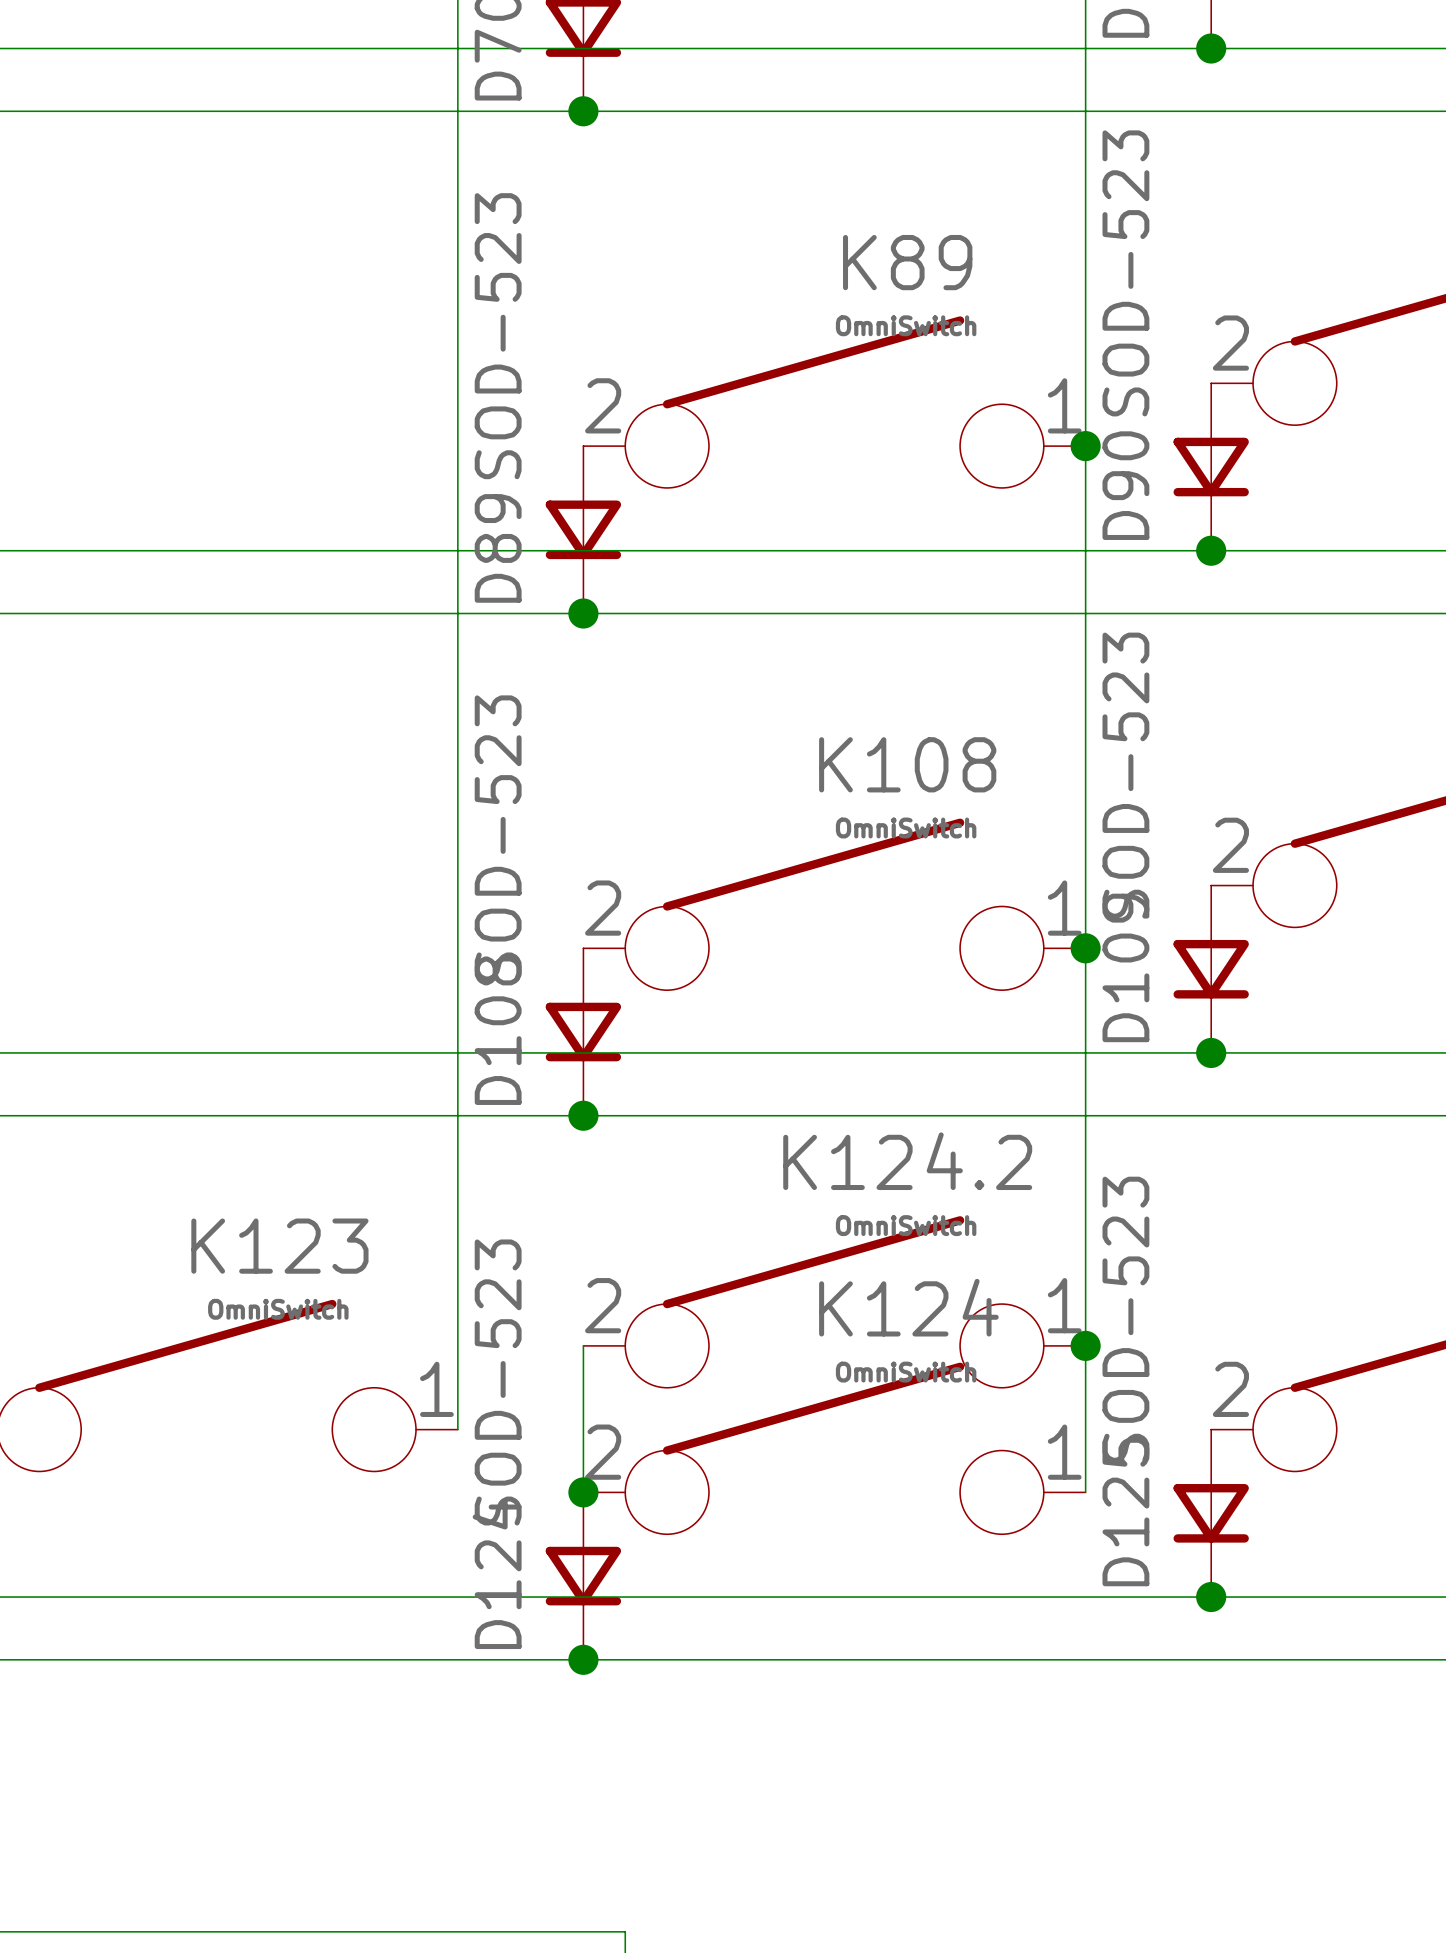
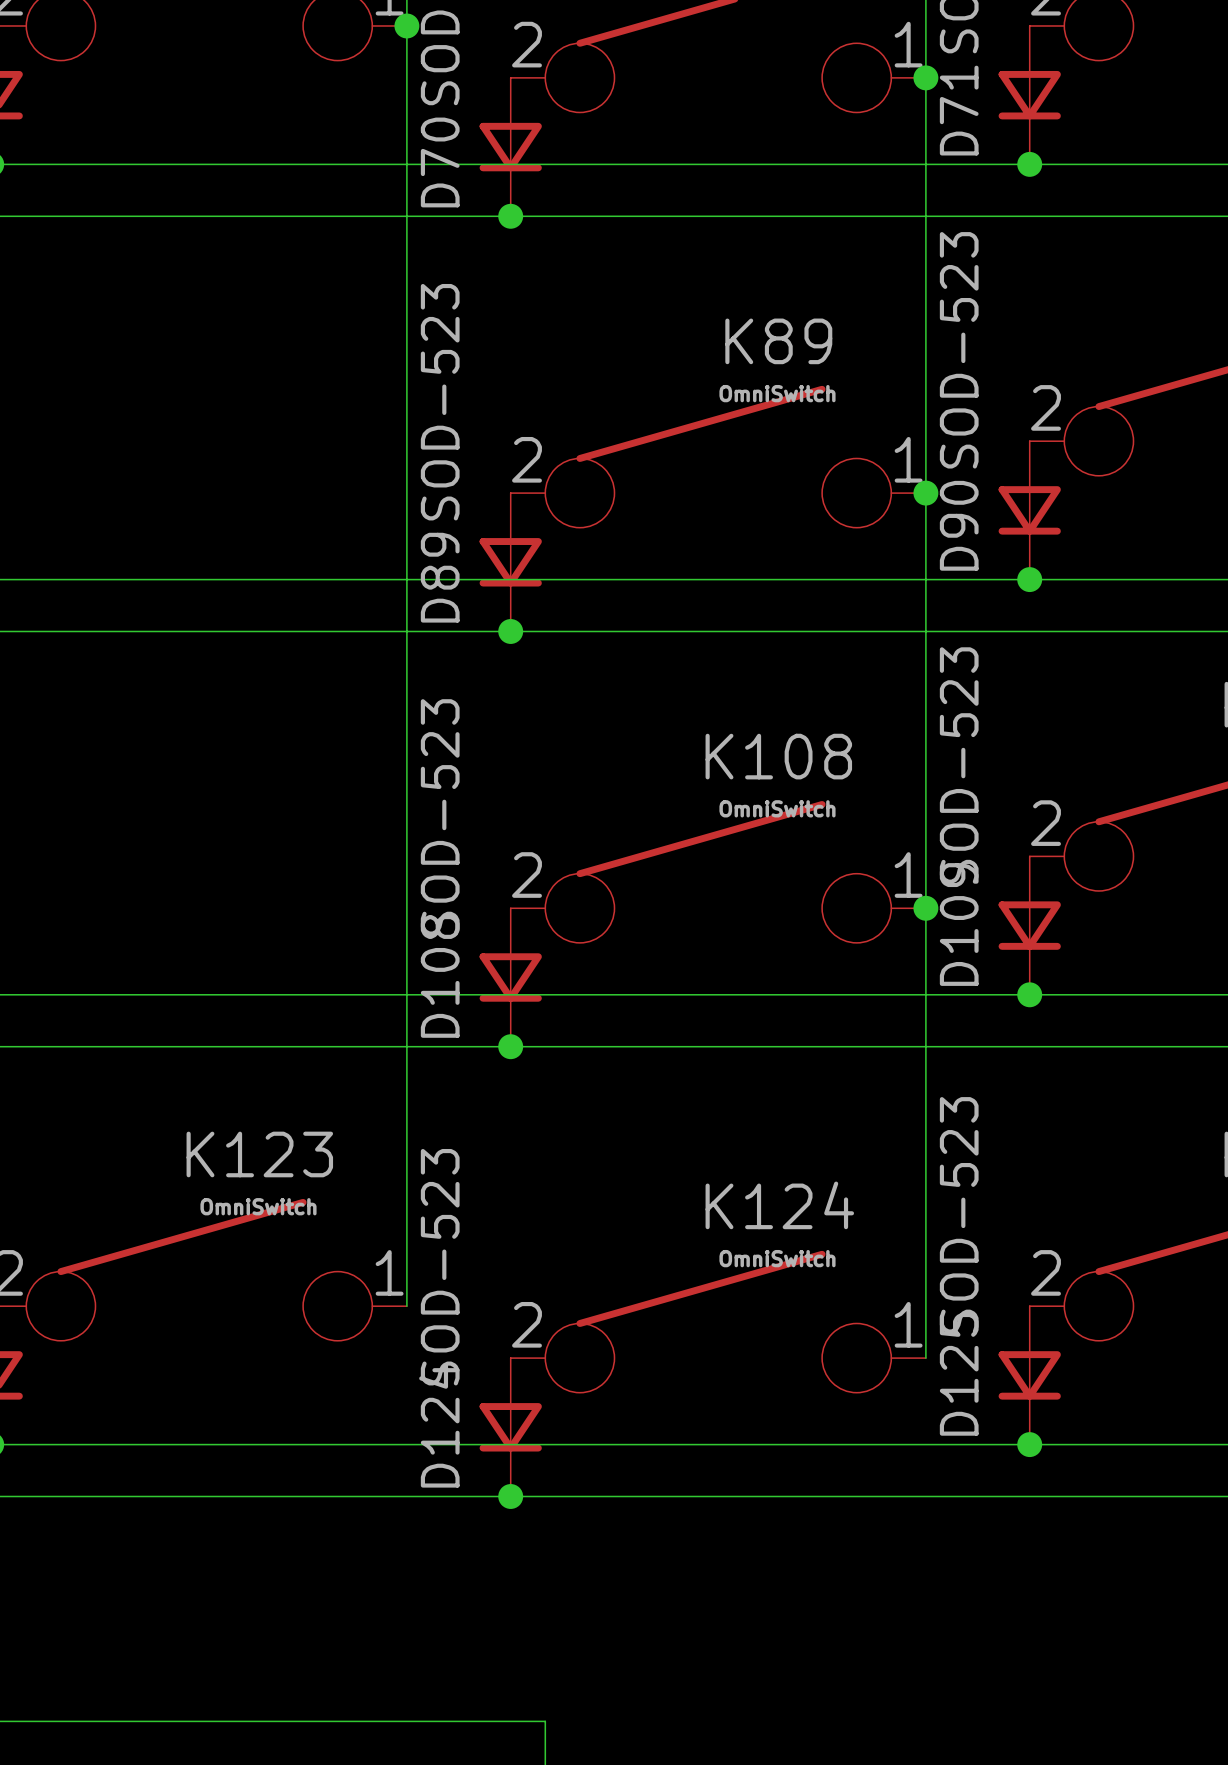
K124.2: OmniSwitch (834, 1301) -> none
wire: (583, 1345) (583, 1492) -> none
junction: (1085, 1345) -> none
junction: (583, 1492) -> none

